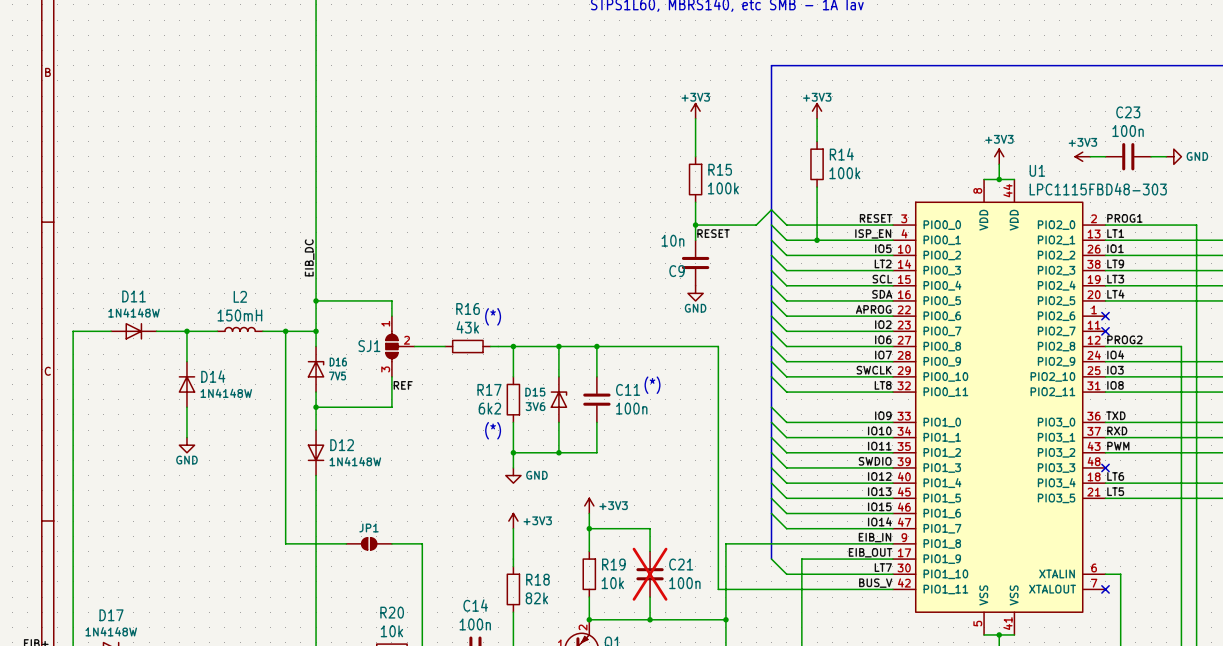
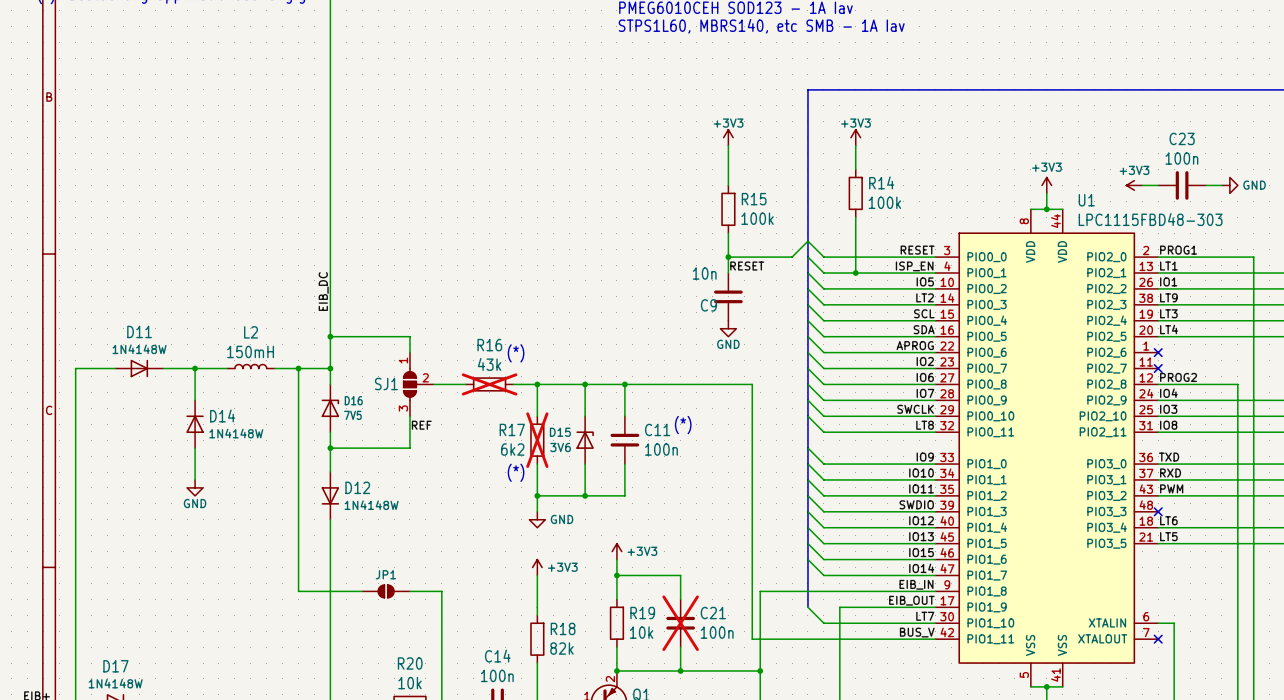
R16 do-not-place cross: none -> (489, 384)
R17 do-not-place cross: none -> (537, 440)

